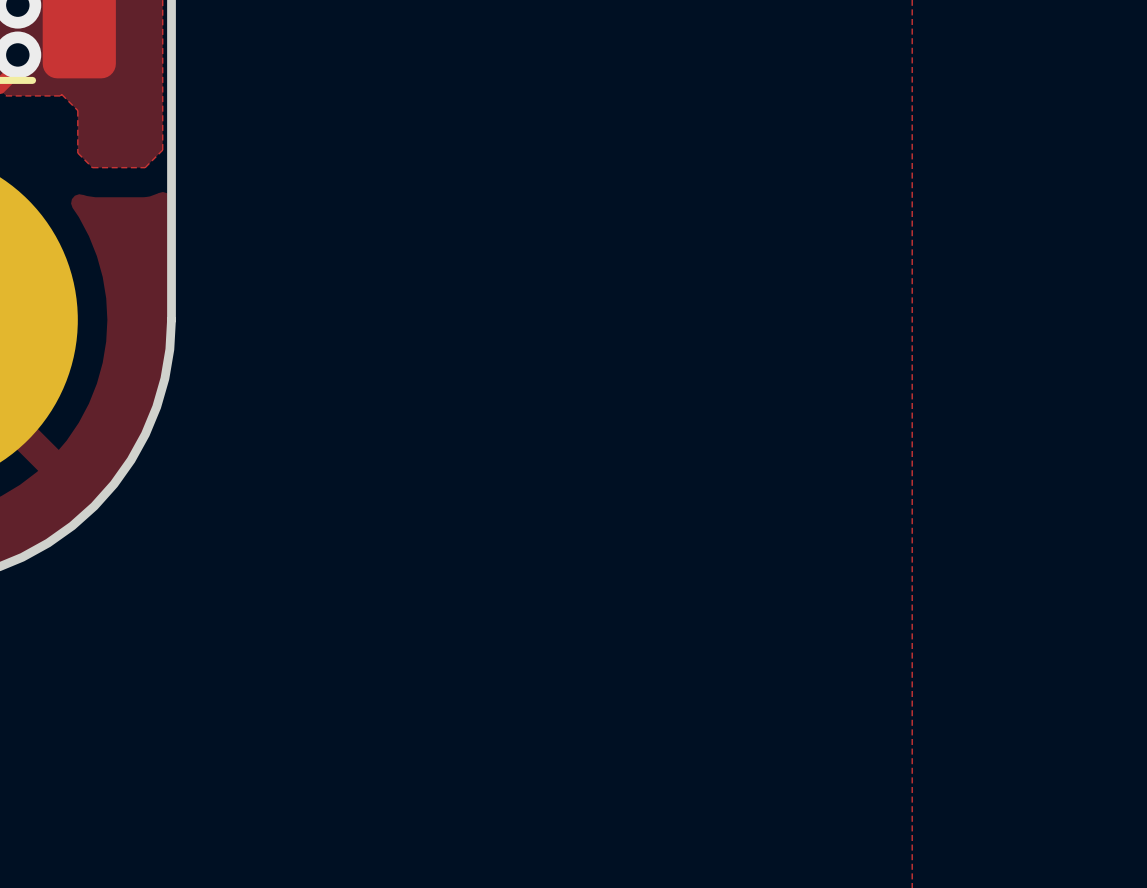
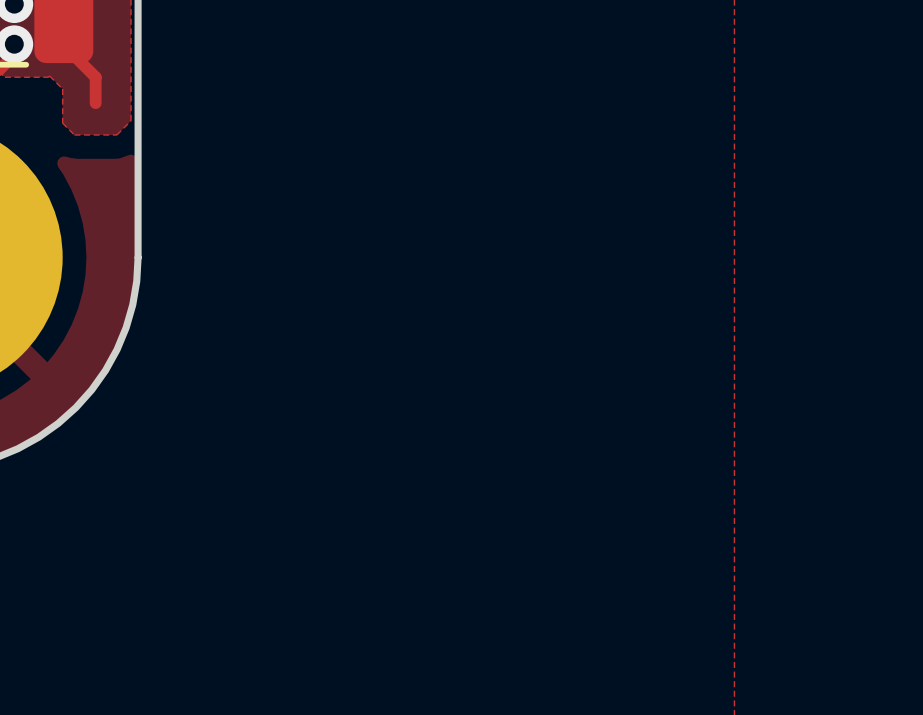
track: none -> (61, 43) (95, 77) (95, 103)

